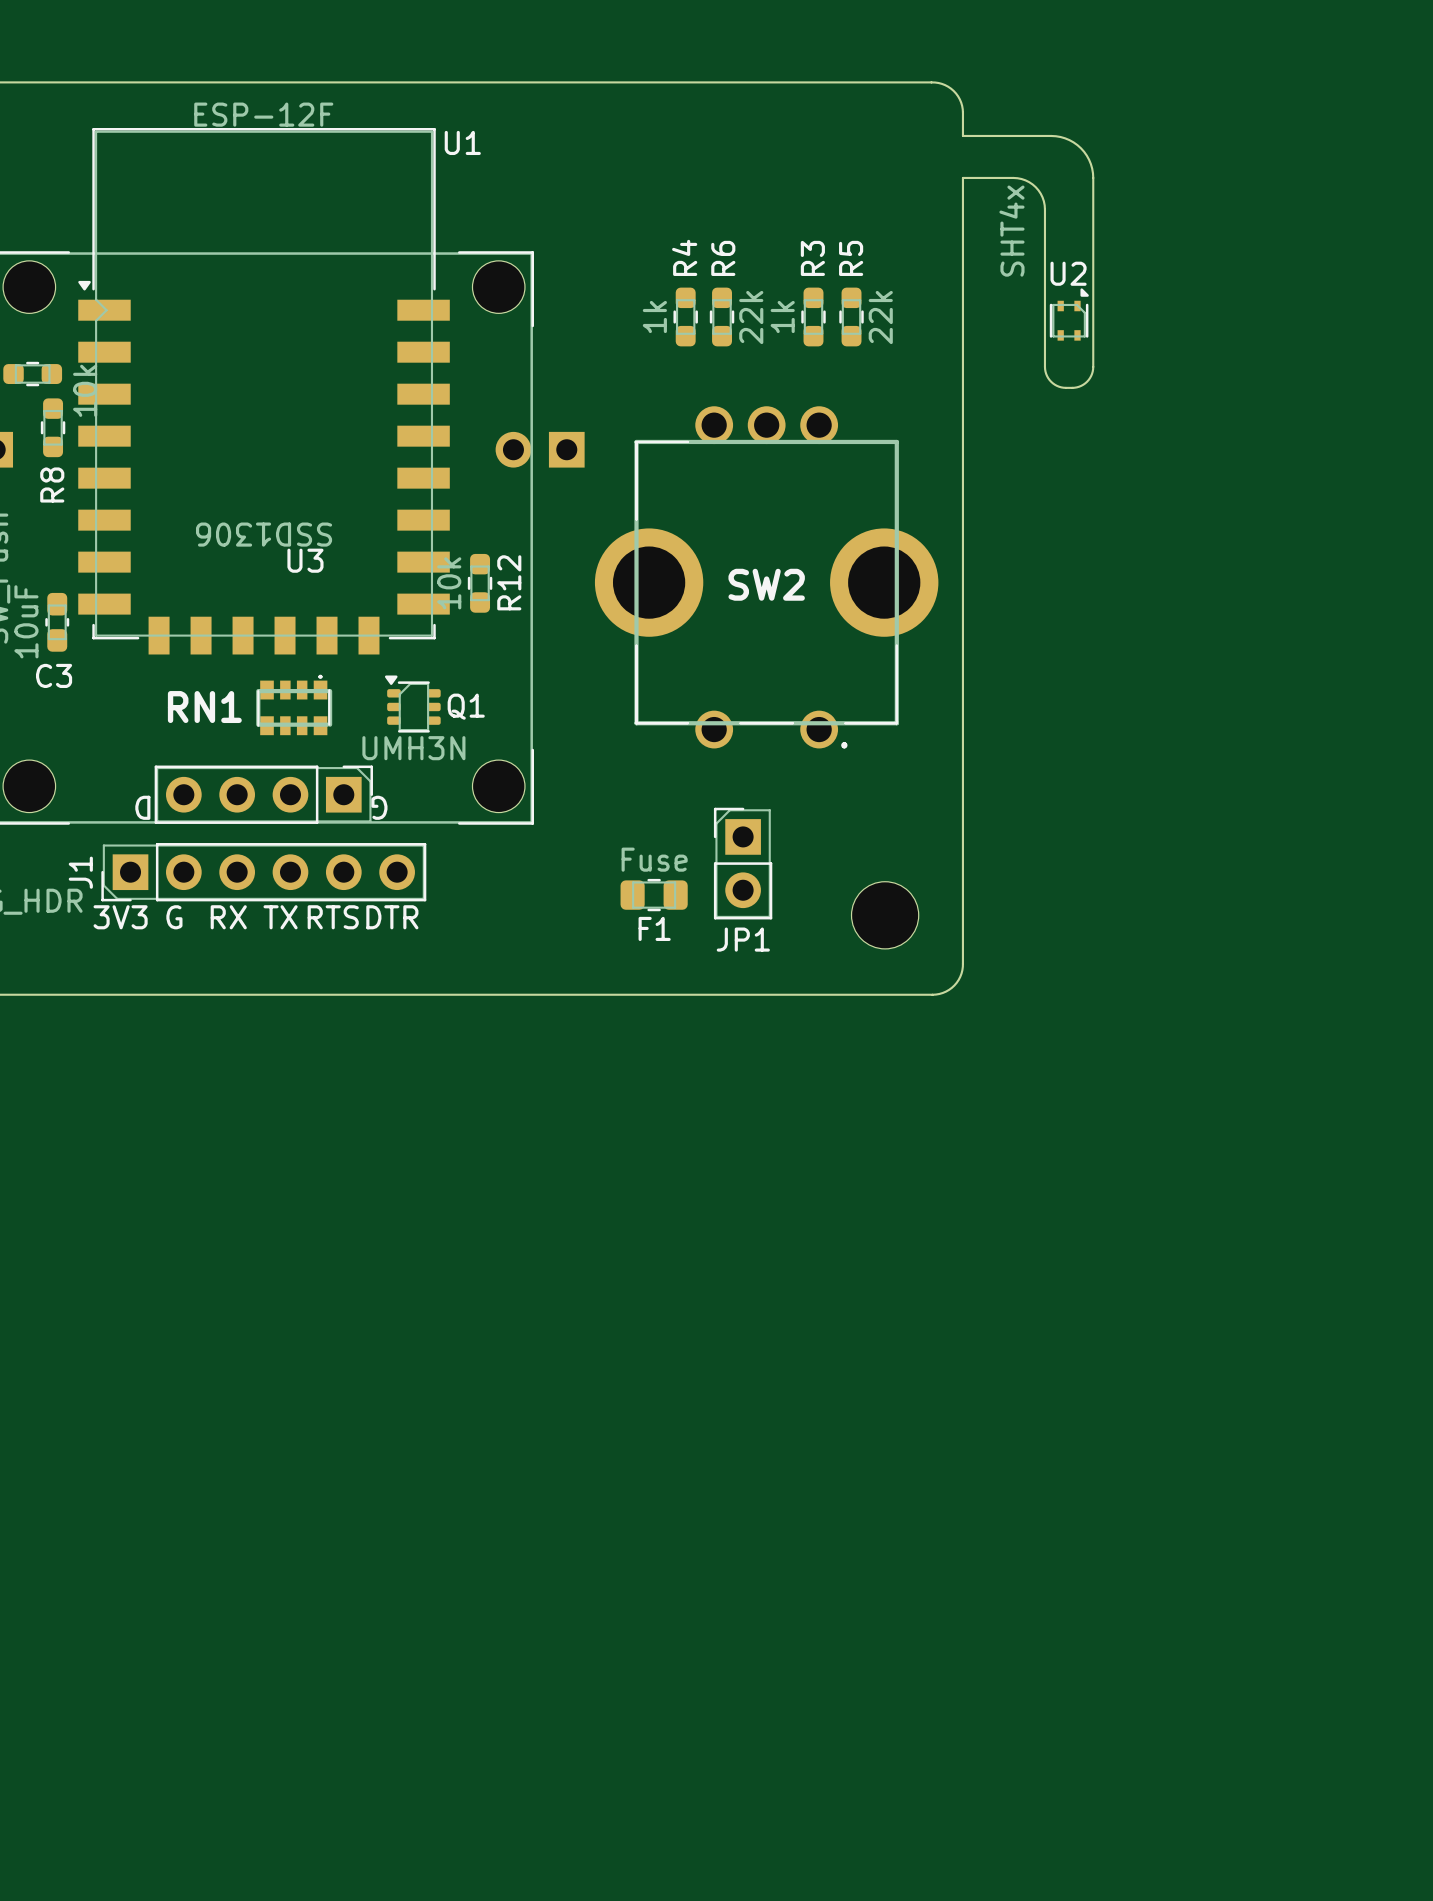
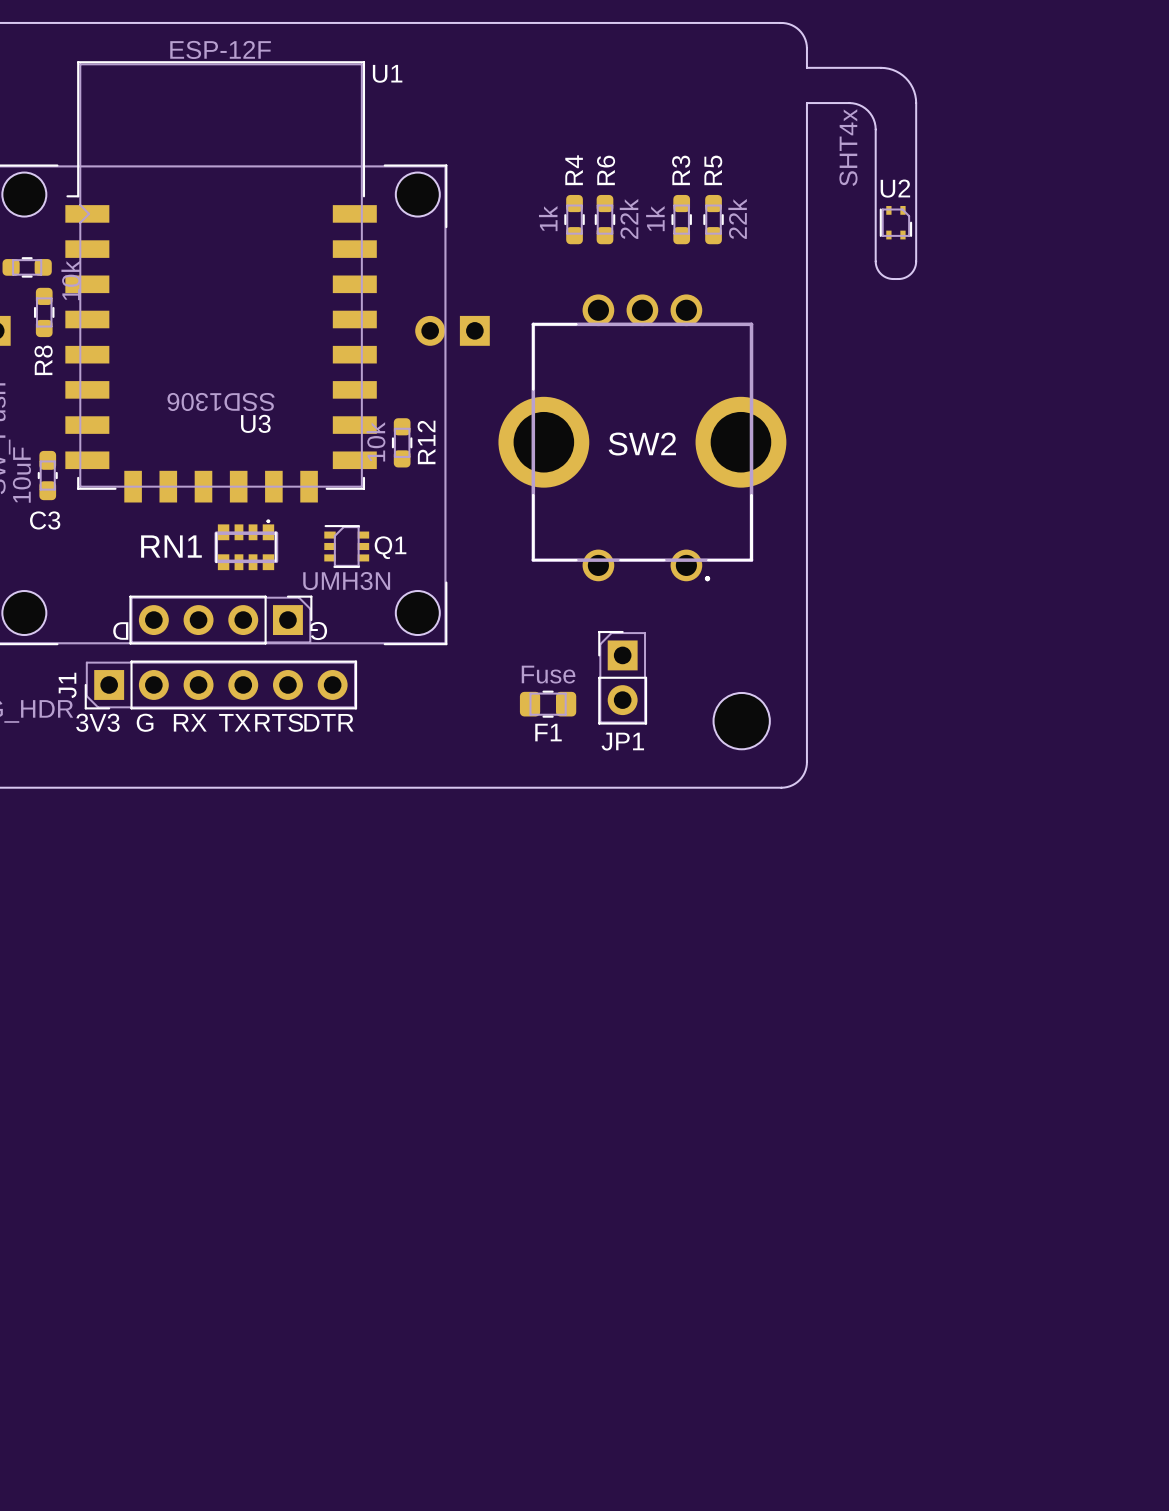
U1 footprint: [78, 127, 450, 655] -> [65, 61, 377, 503]
U2 footprint: [1049, 288, 1089, 341] -> [879, 205, 913, 240]
Q1 footprint: [384, 675, 441, 733] -> [324, 525, 370, 568]

